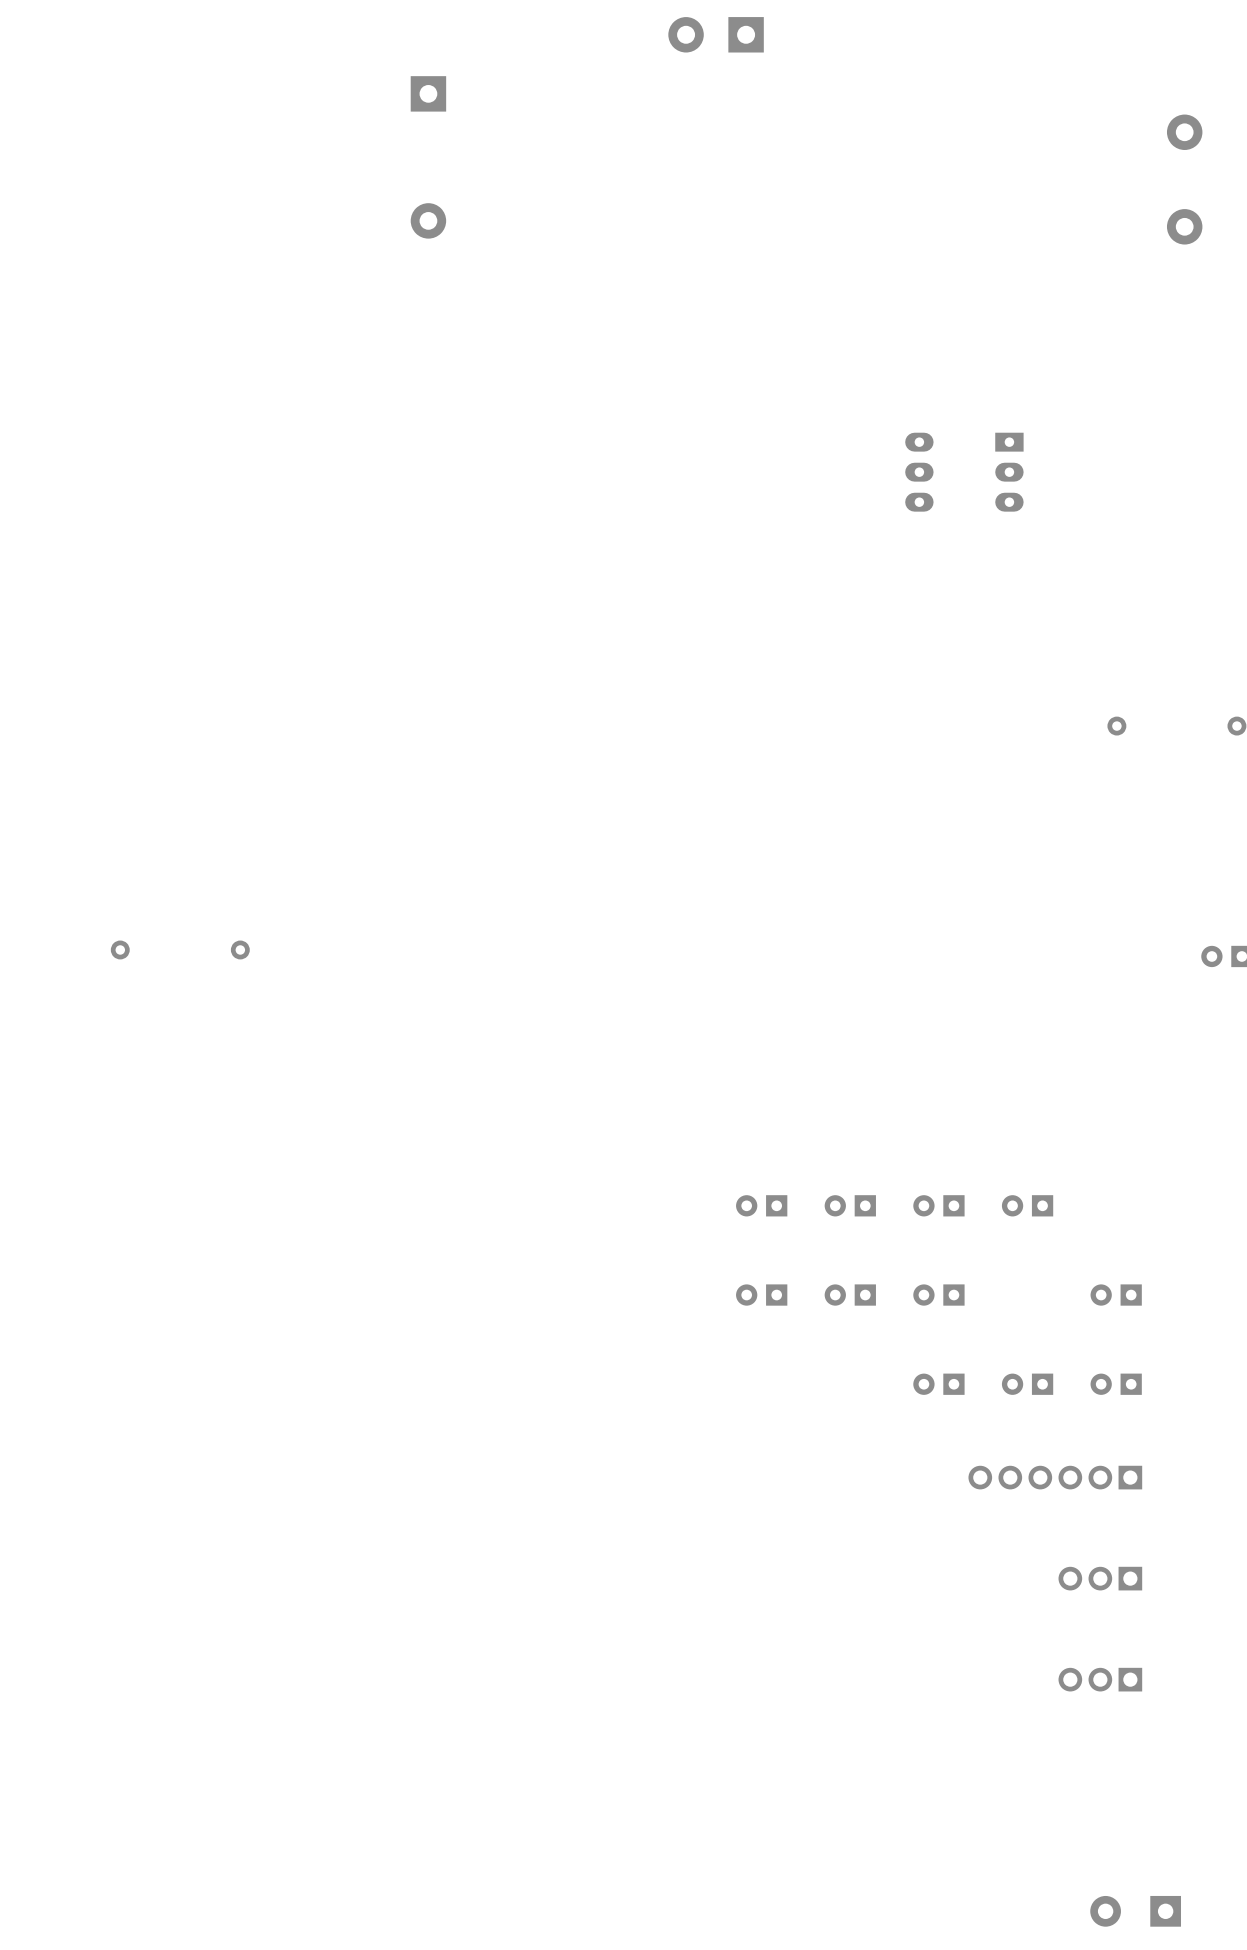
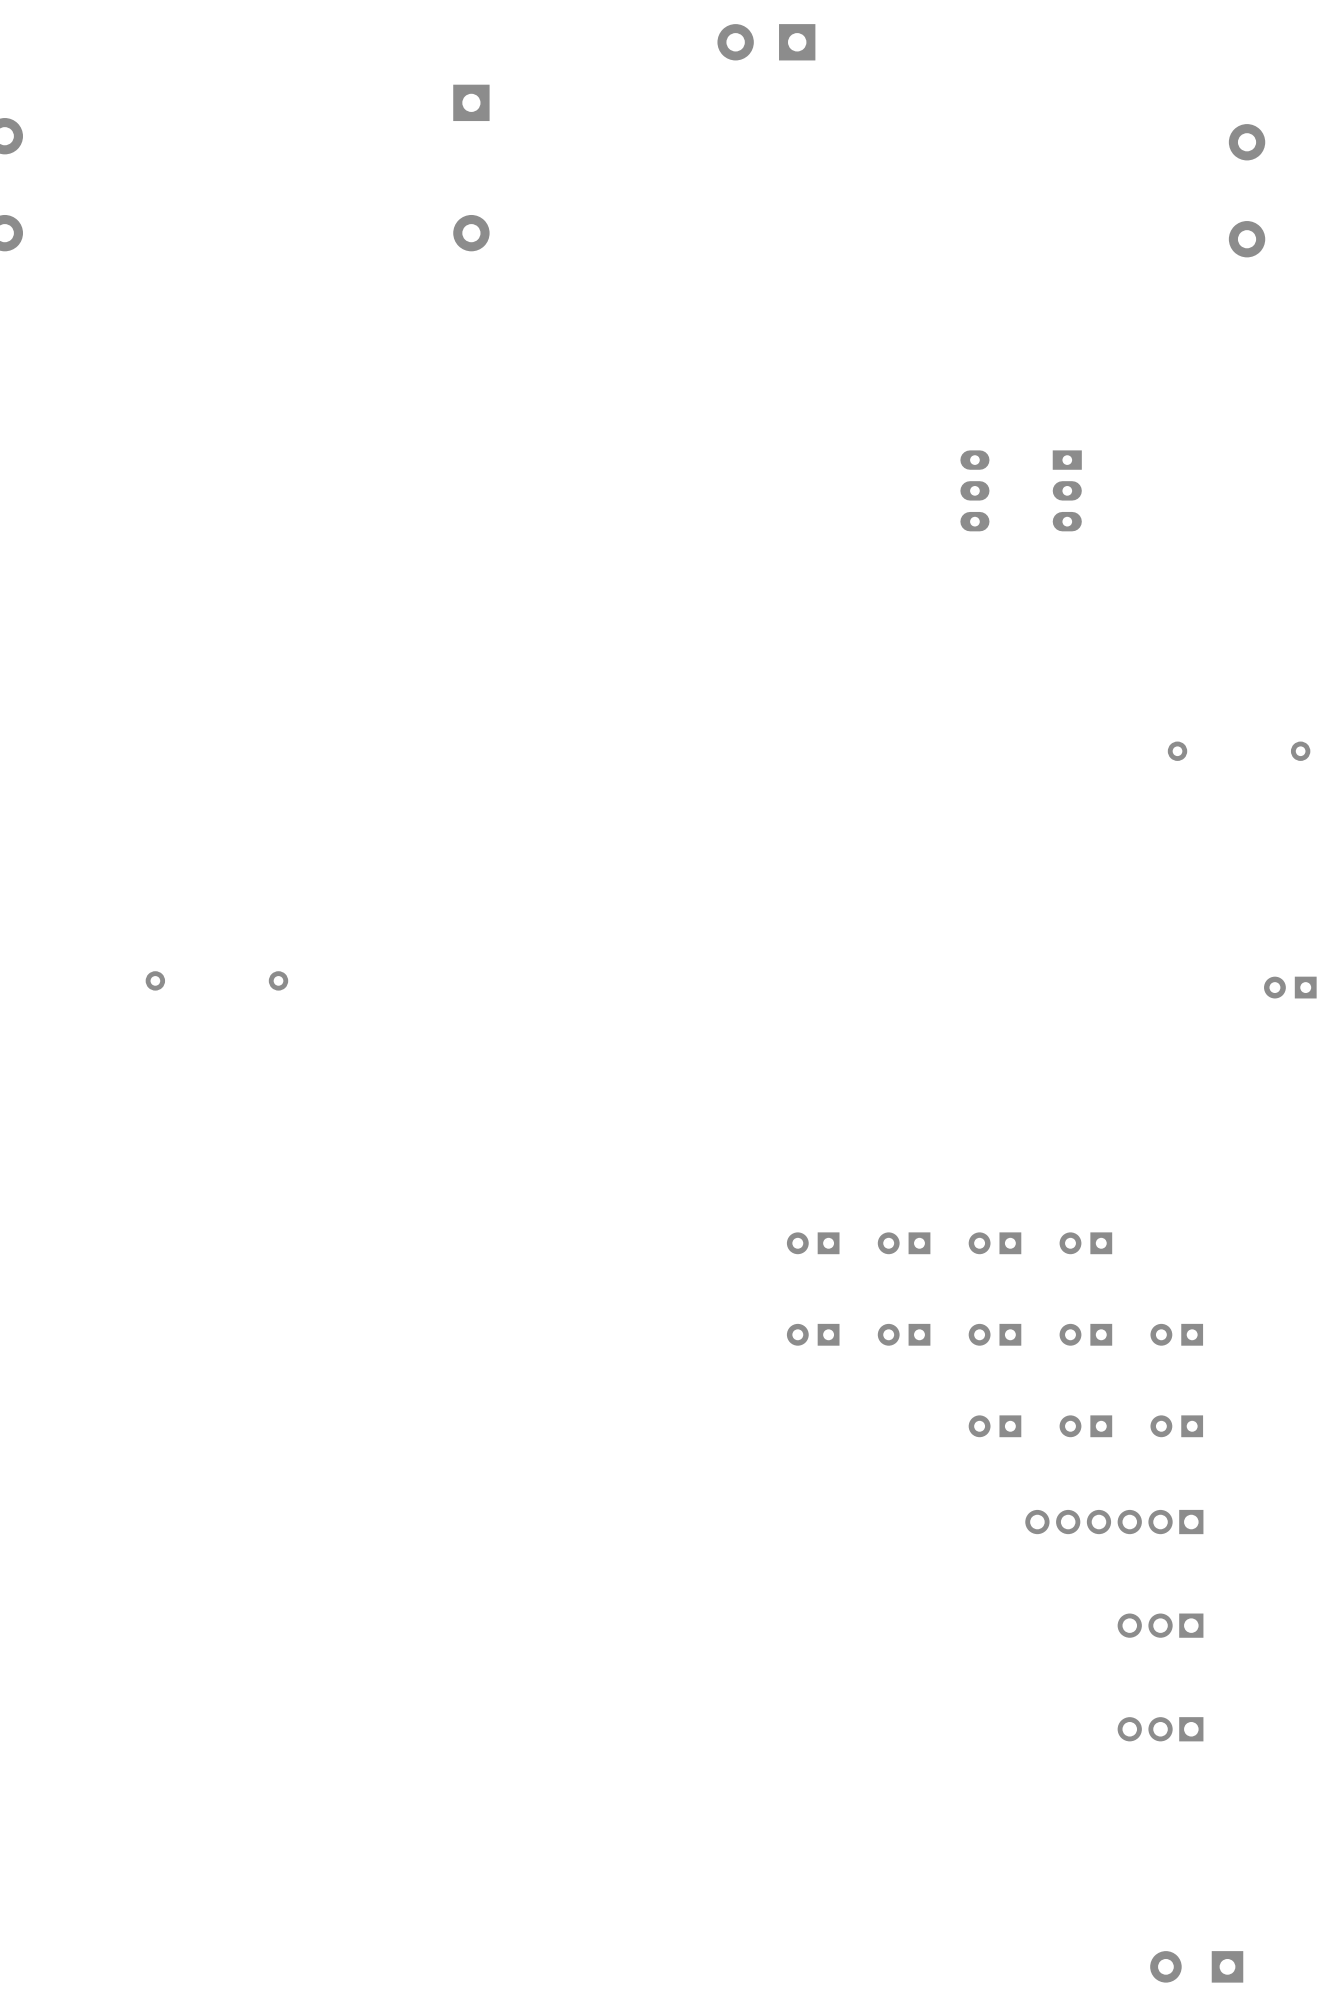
part: none -> (1085, 1334)

